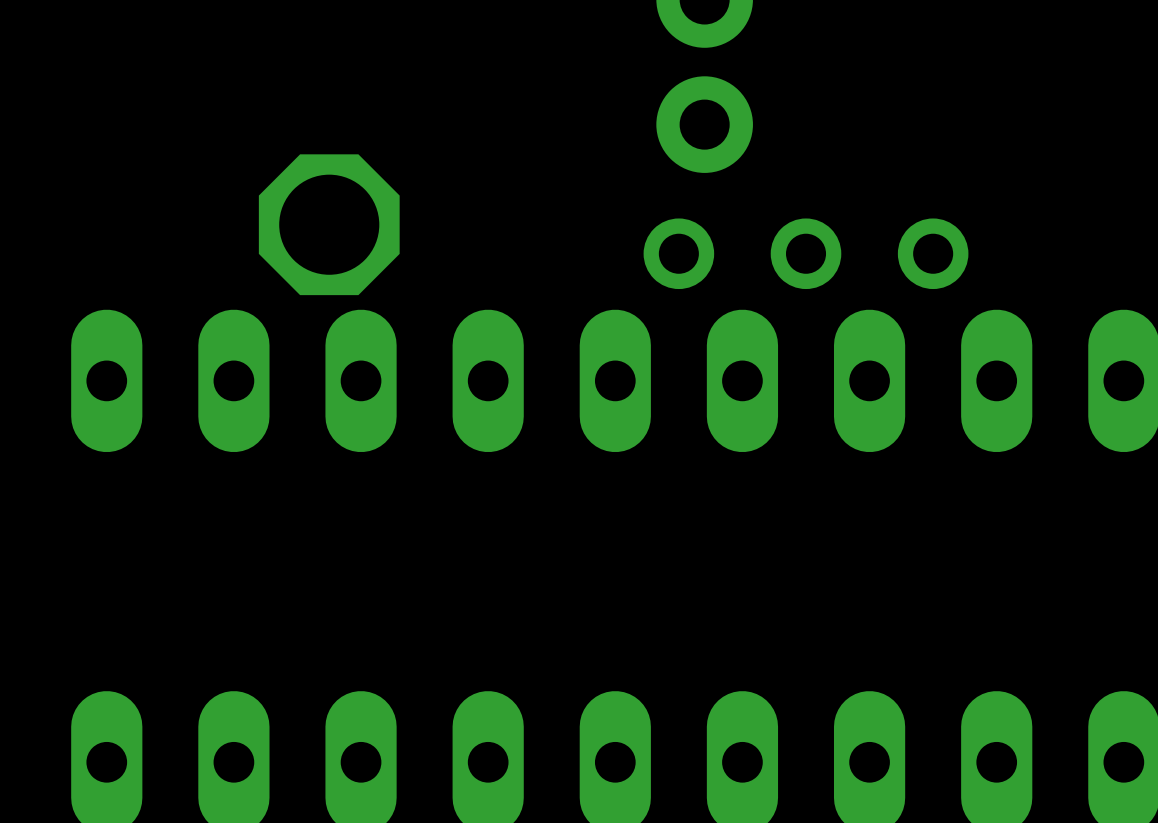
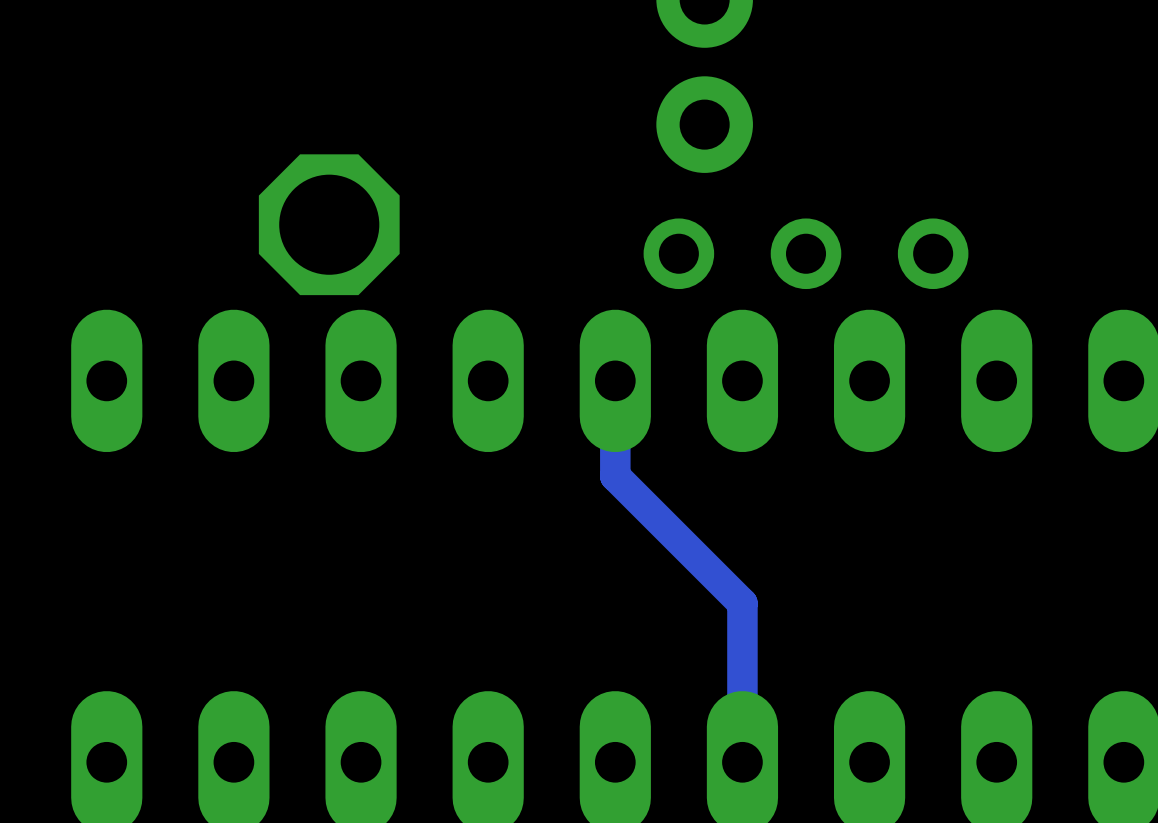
track: none -> (615, 380) (615, 476) (742, 603) (742, 762)

